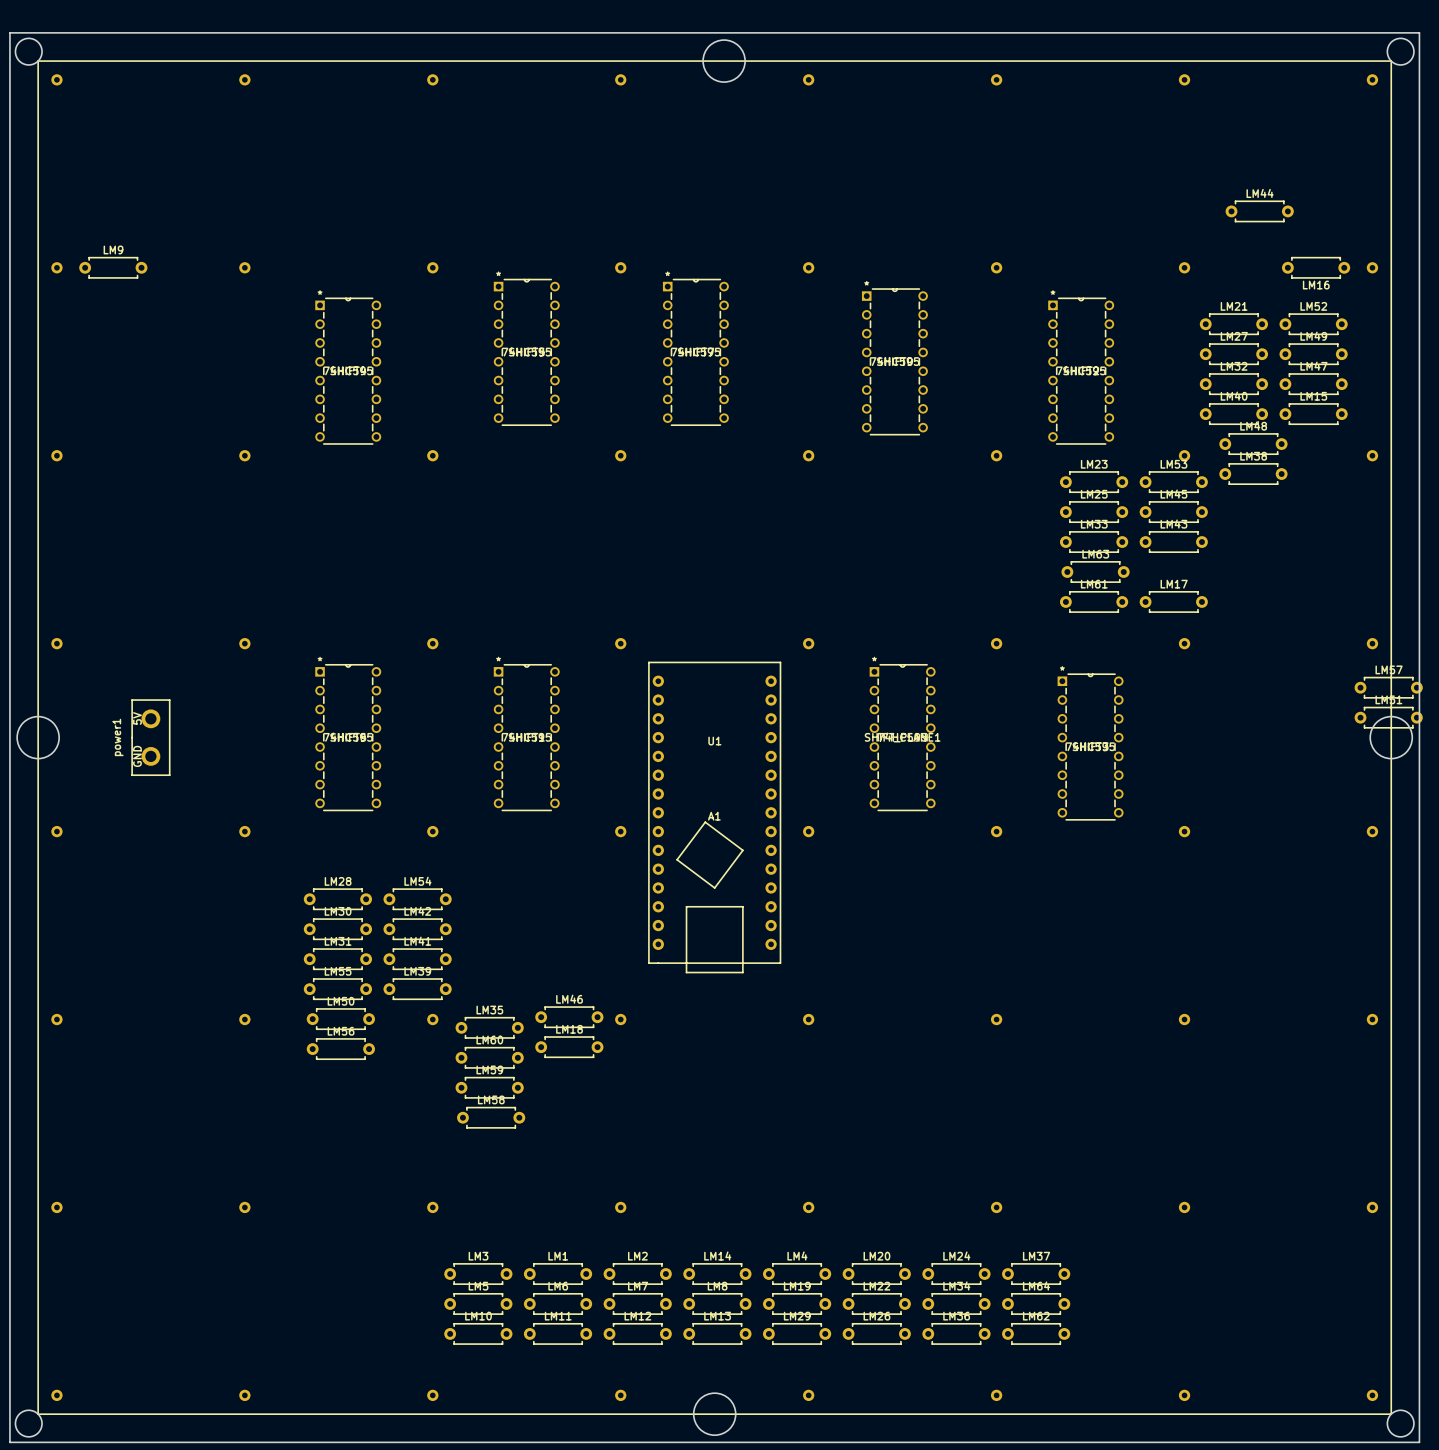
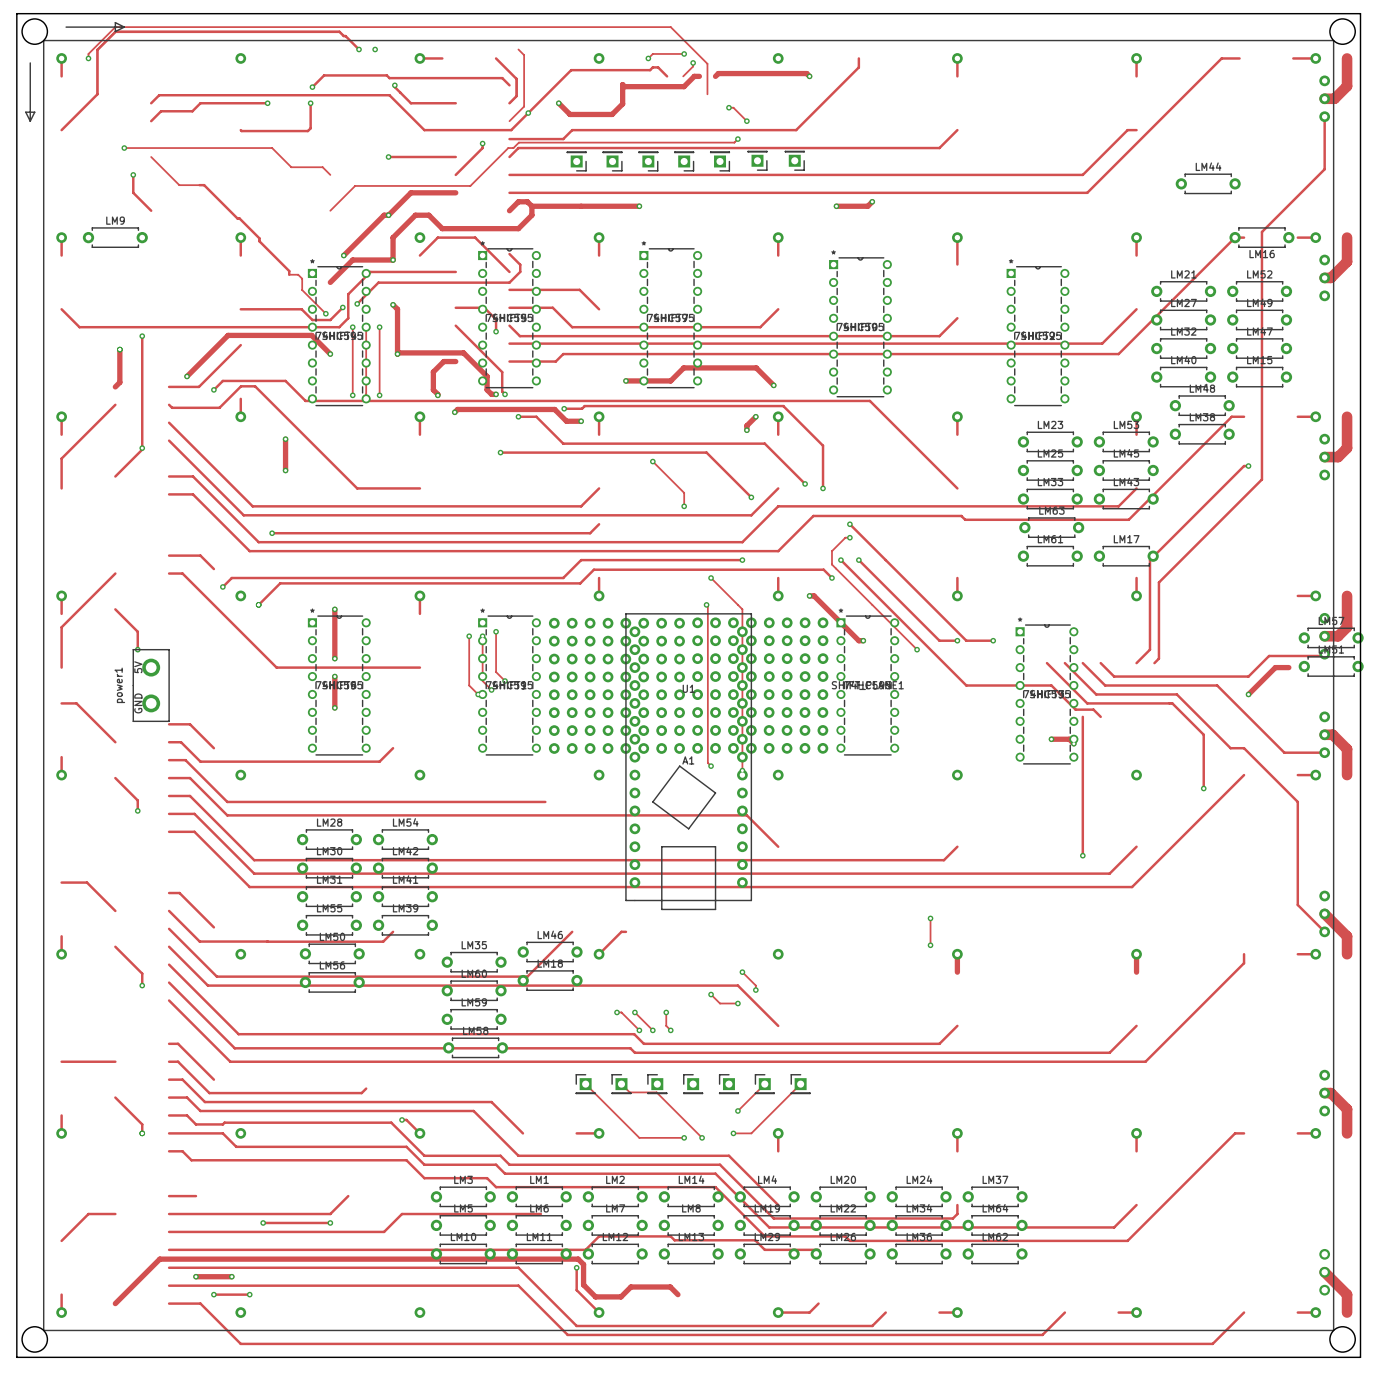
round board edge: [702, 39, 746, 83] -> none
line: none -> (66, 27) (124, 27)
line: none -> (124, 27) (115, 31) (115, 22) (124, 27)
track: none -> (343, 36) (339, 31) (115, 31) (97, 50) (97, 94)
track: none -> (343, 36) (359, 49)
via: none -> (359, 49)
via: none -> (375, 49)
track: none -> (518, 49) (524, 55) (524, 106) (509, 121)
track: none -> (684, 53) (652, 53) (648, 58)
via: none -> (684, 53)
track: none -> (61, 58) (61, 76)
track: none -> (88, 58) (88, 53) (115, 27) (670, 27) (707, 63) (707, 94)
via: none -> (88, 58)
track: none -> (419, 58) (442, 58)
track: none -> (496, 58) (516, 78) (516, 96) (509, 103) (516, 96) (516, 78)
via: none -> (648, 58)
track: none -> (858, 58) (858, 67) (796, 130) (572, 130) (563, 139) (509, 139)
track: none -> (957, 58) (957, 76)
track: none -> (1136, 58) (1136, 76)
track: none -> (1239, 58) (1221, 58) (1087, 192) (509, 192)
track: none -> (1293, 58) (1315, 58)
track: none -> (1347, 58) (1347, 86) (1334, 98) (1324, 98)
line: none -> (30, 62) (30, 121)
track: none -> (693, 62) (693, 66) (683, 76)
via: none -> (693, 62)
track: none -> (667, 76) (658, 67) (652, 67) (650, 70) (571, 70) (511, 130) (424, 130) (389, 95) (159, 95) (151, 103)
track: none -> (699, 76) (694, 76) (684, 86) (624, 86) (622, 84) (622, 103) (612, 114) (569, 114) (558, 103)
track: none -> (715, 76) (718, 73) (806, 73) (809, 76)
via: none -> (809, 76)
track: none -> (394, 85) (410, 103) (455, 103)
via: none -> (394, 85)
track: none -> (509, 85) (502, 78) (389, 78) (386, 75) (324, 75) (312, 87)
via: none -> (312, 87)
track: none -> (97, 94) (61, 130)
part: none -> (1324, 98)
track: none -> (267, 103) (200, 103) (192, 111) (161, 111) (151, 121)
via: none -> (267, 103)
track: none -> (310, 103) (310, 128) (307, 131) (240, 130)
via: none -> (310, 103)
via: none -> (558, 103)
track: none -> (728, 107) (733, 107) (746, 121)
via: none -> (728, 107)
via: none -> (528, 113)
track: none -> (1324, 116) (1324, 169) (1261, 231) (1261, 479) (1158, 582) (1158, 658) (1154, 663)
line: none -> (30, 121) (34, 112) (25, 112) (30, 121)
via: none -> (746, 121)
track: none -> (957, 130) (939, 148) (518, 148) (509, 156)
track: none -> (1136, 130) (1127, 130) (1082, 174) (509, 174)
track: none -> (737, 139) (734, 142) (518, 142) (513, 148) (508, 148) (470, 185) (355, 185) (330, 210)
via: none -> (737, 139)
track: none -> (482, 143) (482, 148) (455, 174)
via: none -> (482, 143)
track: none -> (124, 148) (272, 148) (291, 167) (322, 167) (330, 174)
via: none -> (124, 148)
track: none -> (151, 156) (179, 185) (204, 185) (259, 238) (259, 241) (289, 271) (289, 274) (298, 274) (302, 278) (302, 290) (325, 313)
track: none -> (388, 156) (455, 156)
via: none -> (388, 156)
part: none -> (576, 161)
part: none -> (612, 161)
part: none -> (648, 161)
part: none -> (684, 161)
part: none -> (720, 161)
part: none -> (757, 160)
part: none -> (794, 160)
track: none -> (133, 174) (133, 192) (151, 210)
via: none -> (133, 174)
track: none -> (455, 192) (410, 192) (388, 215) (384, 215) (343, 255)
track: none -> (872, 201) (867, 206) (836, 206)
via: none -> (872, 201)
track: none -> (531, 206) (531, 215) (518, 228) (442, 228) (428, 215) (415, 215) (393, 237) (393, 260) (352, 260) (330, 282)
track: none -> (531, 206) (527, 201) (518, 201) (509, 210)
track: none -> (531, 206) (639, 206)
via: none -> (639, 206)
via: none -> (836, 206)
via: none -> (388, 215)
track: none -> (61, 237) (61, 255)
track: none -> (240, 237) (240, 255)
track: none -> (599, 237) (599, 255)
track: none -> (778, 237) (778, 255)
track: none -> (957, 237) (957, 264)
track: none -> (1136, 237) (1136, 255)
track: none -> (1244, 237) (1235, 237) (1118, 354) (563, 354) (555, 361) (509, 361)
track: none -> (1297, 237) (1315, 237)
track: none -> (1347, 237) (1347, 261) (1330, 277) (1324, 277)
track: none -> (509, 254) (520, 264) (520, 271) (509, 282) (378, 282) (357, 303)
via: none -> (343, 255)
track: none -> (419, 255) (437, 237) (475, 237) (509, 271)
via: none -> (393, 260)
track: none -> (455, 271) (370, 271) (348, 294) (348, 318) (339, 327) (79, 327) (61, 309)
part: none -> (1324, 277)
track: none -> (509, 289) (579, 289) (599, 309)
via: none -> (357, 303)
track: none -> (393, 304) (397, 309) (397, 354) (463, 352) (487, 376) (487, 389) (491, 394) (496, 394)
via: none -> (393, 304)
track: none -> (342, 307) (330, 320) (312, 320) (301, 309) (240, 309)
via: none -> (342, 307)
track: none -> (455, 307) (484, 307) (496, 319) (496, 331)
track: none -> (509, 307) (552, 307) (572, 327) (760, 327) (778, 309)
track: none -> (1136, 309) (1102, 343) (509, 343)
via: none -> (325, 313)
track: none -> (957, 318) (939, 336) (519, 336) (509, 325)
track: none -> (455, 325) (502, 372) (502, 391) (505, 394)
track: none -> (352, 327) (352, 395)
via: none -> (352, 327)
track: none -> (366, 327) (366, 395)
track: none -> (379, 327) (379, 395)
via: none -> (379, 327)
via: none -> (496, 331)
track: none -> (142, 336) (142, 449) (115, 476)
via: none -> (142, 336)
track: none -> (240, 345) (198, 386) (169, 386)
track: none -> (119, 349) (119, 382) (115, 386)
via: none -> (119, 349)
track: none -> (330, 354) (311, 335) (228, 335) (187, 376)
via: none -> (330, 354)
via: none -> (397, 354)
track: none -> (455, 361) (443, 361) (433, 371) (433, 389) (437, 395)
via: none -> (187, 376)
track: none -> (625, 380) (670, 380) (683, 367) (756, 367) (773, 385)
via: none -> (625, 380)
via: none -> (773, 385)
track: none -> (213, 389) (222, 380) (285, 380) (305, 400) (869, 400) (957, 488)
via: none -> (213, 389)
via: none -> (496, 394)
via: none -> (505, 394)
via: none -> (352, 395)
via: none -> (379, 395)
via: none -> (437, 395)
track: none -> (240, 398) (240, 416)
track: none -> (115, 404) (61, 458) (61, 488)
track: none -> (169, 404) (172, 407) (219, 407) (241, 386) (255, 386) (357, 488) (419, 488)
track: none -> (564, 408) (582, 408) (584, 406) (783, 406) (823, 445) (823, 488)
via: none -> (564, 408)
track: none -> (454, 412) (457, 409) (554, 409) (566, 421) (581, 421)
via: none -> (454, 412)
track: none -> (61, 416) (61, 434)
track: none -> (419, 416) (419, 434)
track: none -> (518, 416) (536, 416) (563, 443) (764, 443) (805, 483)
via: none -> (518, 416)
track: none -> (599, 416) (599, 434)
track: none -> (755, 416) (746, 425) (746, 430)
via: none -> (755, 416)
track: none -> (778, 416) (778, 434)
track: none -> (957, 416) (957, 434)
track: none -> (1136, 416) (1136, 434)
track: none -> (1244, 416) (1231, 416) (1128, 519) (965, 519) (961, 515) (813, 515) (778, 551) (249, 551) (192, 494) (169, 494)
track: none -> (1297, 416) (1315, 416)
track: none -> (1347, 416) (1347, 448) (1338, 457) (1324, 457)
via: none -> (581, 421)
track: none -> (169, 422) (252, 506) (581, 506) (599, 488)
via: none -> (746, 430)
track: none -> (285, 439) (285, 470)
via: none -> (285, 439)
track: none -> (169, 440) (243, 515) (751, 515) (778, 488)
via: none -> (142, 448)
track: none -> (500, 452) (706, 452) (751, 497)
via: none -> (500, 452)
part: none -> (1324, 457)
track: none -> (652, 461) (684, 492) (684, 506)
via: none -> (652, 461)
track: none -> (1248, 466) (1244, 466) (1149, 560) (1149, 649) (1136, 663)
via: none -> (1248, 466)
via: none -> (285, 470)
track: none -> (169, 476) (192, 476) (258, 542) (742, 542) (778, 506) (1118, 506) (1136, 488)
via: none -> (805, 483)
via: none -> (823, 488)
via: none -> (751, 497)
via: none -> (684, 506)
track: none -> (599, 524) (590, 533) (272, 533)
track: none -> (849, 524) (966, 640) (993, 640)
via: none -> (849, 524)
via: none -> (272, 533)
track: none -> (849, 537) (845, 537) (831, 551) (831, 564) (917, 649)
via: none -> (849, 537)
track: none -> (169, 555) (200, 555) (213, 569)
track: none -> (742, 560) (581, 560) (563, 578) (231, 578) (222, 586)
via: none -> (742, 560)
track: none -> (840, 560) (966, 685) (1051, 685) (1075, 709) (1093, 709) (1100, 716)
via: none -> (840, 560)
track: none -> (858, 560) (939, 640) (957, 640)
via: none -> (858, 560)
track: none -> (115, 573) (61, 627) (61, 667)
track: none -> (169, 573) (182, 573) (276, 667) (419, 667)
track: none -> (599, 578) (599, 595)
track: none -> (711, 578) (742, 609) (742, 770)
via: none -> (711, 578)
track: none -> (778, 578) (778, 595)
track: none -> (831, 578) (823, 569) (593, 569) (580, 583) (280, 583) (258, 604)
via: none -> (831, 578)
track: none -> (957, 578) (957, 595)
track: none -> (1136, 578) (1136, 595)
via: none -> (222, 586)
track: none -> (61, 595) (61, 613)
track: none -> (419, 595) (419, 613)
track: none -> (809, 595) (814, 595) (858, 640) (863, 640)
via: none -> (809, 595)
track: none -> (1297, 595) (1315, 595)
track: none -> (1347, 595) (1347, 627) (1338, 636) (1324, 636)
via: none -> (258, 604)
track: none -> (706, 604) (707, 762) (711, 766)
via: none -> (706, 604)
track: none -> (115, 609) (137, 631) (137, 649)
track: none -> (334, 609) (334, 658)
via: none -> (334, 609)
track: none -> (496, 631) (496, 672) (505, 681)
via: none -> (496, 631)
track: none -> (469, 636) (469, 685) (478, 694)
via: none -> (469, 636)
track: none -> (482, 636) (482, 681) (491, 689)
via: none -> (482, 636)
part: none -> (1324, 636)
via: none -> (863, 640)
via: none -> (957, 640)
via: none -> (993, 640)
via: none -> (137, 649)
part: none -> (581, 650)
part: none -> (652, 650)
part: none -> (724, 649)
part: none -> (796, 649)
via: none -> (917, 649)
track: none -> (1324, 654) (1322, 655) (1269, 655) (1248, 676) (1114, 676) (1100, 663)
via: none -> (334, 658)
track: none -> (1046, 663) (1087, 703) (1172, 703) (1203, 734) (1203, 788)
track: none -> (1064, 663) (1096, 694) (1176, 694) (1230, 748) (1244, 748) (1297, 801) (1297, 904) (1324, 931)
track: none -> (1082, 663) (1105, 685) (1217, 685) (1284, 752) (1324, 752)
round board edge: [16, 716, 60, 759] -> none
round board edge: [1370, 716, 1413, 759] -> none
track: none -> (1288, 667) (1275, 667) (1248, 694)
track: none -> (334, 676) (334, 707)
via: none -> (334, 676)
via: none -> (505, 681)
via: none -> (491, 689)
via: none -> (478, 694)
via: none -> (1248, 694)
track: none -> (61, 703) (76, 703) (115, 742)
via: none -> (334, 707)
track: none -> (1082, 716) (1082, 855)
part: none -> (581, 721)
part: none -> (652, 721)
part: none -> (724, 721)
part: none -> (796, 721)
track: none -> (169, 724) (190, 724) (213, 748)
track: none -> (1324, 734) (1332, 734) (1347, 749) (1347, 775)
part: none -> (1324, 734)
track: none -> (1051, 739) (1069, 739) (1073, 743)
via: none -> (1051, 739)
track: none -> (169, 742) (181, 742) (200, 761) (379, 761) (393, 748)
via: none -> (1073, 743)
track: none -> (61, 757) (61, 775)
track: none -> (169, 760) (185, 760) (227, 801) (545, 801)
via: none -> (711, 766)
via: none -> (742, 770)
track: none -> (1244, 775) (1132, 887) (249, 887) (194, 831) (169, 831)
track: none -> (1297, 775) (1315, 775)
track: none -> (115, 778) (137, 800) (137, 810)
track: none -> (169, 778) (190, 778) (227, 815) (746, 815) (778, 846)
via: none -> (1203, 788)
track: none -> (169, 795) (190, 795) (254, 860) (943, 860) (957, 846)
via: none -> (137, 810)
track: none -> (169, 813) (194, 813) (254, 873) (1109, 873) (1136, 846)
via: none -> (1082, 855)
track: none -> (61, 882) (86, 882) (115, 910)
track: none -> (169, 893) (179, 893) (213, 927)
track: none -> (169, 910) (199, 941) (383, 941) (393, 931)
track: none -> (1324, 913) (1347, 936) (1347, 954)
part: none -> (1324, 913)
track: none -> (930, 918) (930, 945)
via: none -> (930, 918)
track: none -> (169, 928) (216, 976) (527, 976) (572, 931)
track: none -> (625, 931) (621, 931) (599, 954)
track: none -> (61, 936) (61, 954)
via: none -> (930, 945)
track: none -> (115, 946) (142, 973) (142, 985)
track: none -> (169, 946) (207, 985) (737, 985) (778, 1025)
track: none -> (957, 954) (957, 972)
track: none -> (1136, 954) (1136, 972)
track: none -> (1244, 954) (1244, 963) (1145, 1061) (230, 1061) (169, 1000)
track: none -> (1297, 954) (1315, 954)
track: none -> (169, 964) (238, 1034) (634, 1034) (643, 1043) (939, 1043) (957, 1025)
track: none -> (742, 972) (755, 985) (755, 990)
via: none -> (742, 972)
track: none -> (169, 982) (234, 1048) (630, 1048) (634, 1052) (1109, 1052) (1136, 1025)
via: none -> (142, 985)
via: none -> (755, 990)
track: none -> (711, 994) (720, 1003) (737, 1003)
via: none -> (711, 994)
via: none -> (737, 1003)
track: none -> (617, 1012) (621, 1012) (639, 1030)
via: none -> (617, 1012)
track: none -> (634, 1012) (652, 1030)
via: none -> (634, 1012)
track: none -> (666, 1012) (666, 1025) (670, 1030)
via: none -> (666, 1012)
via: none -> (639, 1030)
via: none -> (652, 1030)
via: none -> (670, 1030)
track: none -> (169, 1043) (178, 1043) (213, 1079)
track: none -> (61, 1061) (115, 1061)
track: none -> (169, 1061) (178, 1061) (209, 1093) (361, 1093) (366, 1088)
track: none -> (169, 1079) (182, 1079) (204, 1102) (491, 1102) (522, 1133)
track: none -> (585, 1084) (639, 1137) (684, 1137)
part: none -> (585, 1084)
track: none -> (621, 1084) (629, 1092) (656, 1092) (702, 1137)
part: none -> (621, 1084)
part: none -> (657, 1084)
part: none -> (693, 1084)
part: none -> (728, 1084)
track: none -> (764, 1084) (737, 1111)
part: none -> (764, 1084)
track: none -> (800, 1084) (751, 1133) (733, 1133)
part: none -> (800, 1084)
track: none -> (1324, 1093) (1330, 1093) (1347, 1109) (1347, 1133)
part: none -> (1324, 1093)
track: none -> (115, 1097) (142, 1124) (142, 1133)
track: none -> (169, 1097) (187, 1097) (200, 1111) (473, 1111) (518, 1155) (728, 1155) (778, 1205)
via: none -> (737, 1111)
track: none -> (61, 1115) (61, 1133)
track: none -> (169, 1115) (187, 1115) (195, 1124) (391, 1122) (424, 1155) (500, 1155) (509, 1164) (720, 1164) (773, 1218) (952, 1218) (957, 1214) (957, 1205)
track: none -> (402, 1119) (406, 1119) (419, 1133)
via: none -> (402, 1119)
via: none -> (142, 1133)
track: none -> (169, 1133) (222, 1133) (236, 1146) (406, 1146) (424, 1164) (496, 1164) (505, 1173) (715, 1173) (769, 1227) (1114, 1227) (1136, 1205)
track: none -> (576, 1133) (599, 1133)
via: none -> (733, 1133)
track: none -> (778, 1133) (778, 1151)
track: none -> (957, 1133) (957, 1151)
track: none -> (1136, 1133) (1136, 1151)
track: none -> (1244, 1133) (1235, 1133) (1127, 1240) (849, 1240) (845, 1236) (764, 1236) (715, 1187) (496, 1187) (487, 1178) (424, 1178) (406, 1160) (191, 1160) (182, 1151) (169, 1151)
track: none -> (1297, 1133) (1315, 1133)
via: none -> (684, 1137)
via: none -> (702, 1137)
track: none -> (169, 1196) (195, 1196)
track: none -> (348, 1196) (330, 1214) (169, 1214)
track: none -> (115, 1214) (88, 1214) (61, 1240)
track: none -> (540, 1214) (402, 1214) (384, 1231) (169, 1231)
track: none -> (263, 1222) (330, 1222)
via: none -> (263, 1222)
via: none -> (330, 1222)
track: none -> (169, 1249) (585, 1249) (599, 1236) (670, 1236) (674, 1240) (755, 1240) (764, 1249) (818, 1249)
track: none -> (169, 1267) (518, 1267) (576, 1325) (872, 1325) (885, 1312)
track: none -> (576, 1267) (576, 1290) (599, 1312)
via: none -> (576, 1267)
track: none -> (1324, 1272) (1347, 1294) (1347, 1312)
part: none -> (1324, 1272)
track: none -> (195, 1276) (231, 1276)
via: none -> (195, 1276)
via: none -> (231, 1276)
track: none -> (169, 1285) (518, 1285) (567, 1334) (1042, 1334) (1064, 1312)
track: none -> (61, 1294) (61, 1312)
track: none -> (213, 1294) (249, 1294)
via: none -> (213, 1294)
via: none -> (249, 1294)
track: none -> (677, 1294) (670, 1287) (630, 1287) (621, 1296) (595, 1296) (583, 1284) (583, 1264) (578, 1259) (159, 1259) (115, 1303)
track: none -> (169, 1303) (200, 1303) (240, 1343) (1212, 1343) (1244, 1312)
track: none -> (818, 1303) (809, 1312) (778, 1312)
round board edge: [693, 1392, 736, 1436] -> none
track: none -> (939, 1312) (957, 1312)
track: none -> (1118, 1312) (1136, 1312)
track: none -> (1297, 1312) (1315, 1312)

